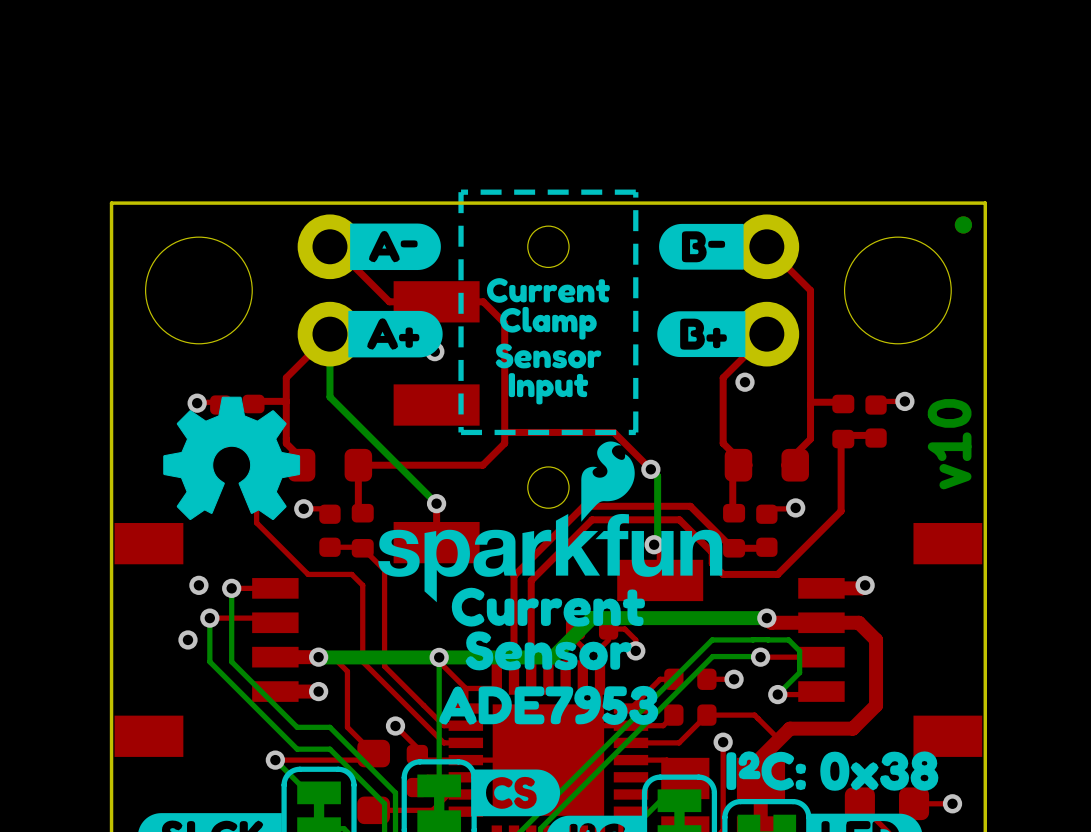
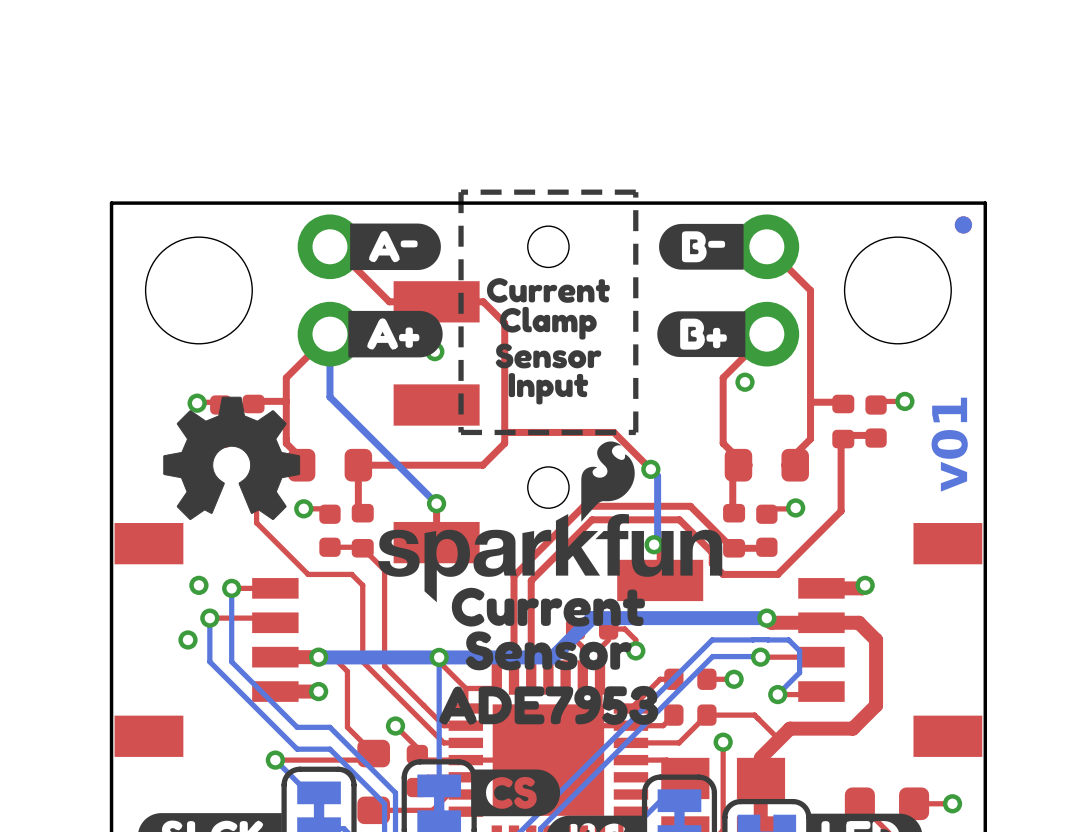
text: v10 (949, 444) -> v01 (949, 444)
drawing: [726, 751, 939, 791] -> none

